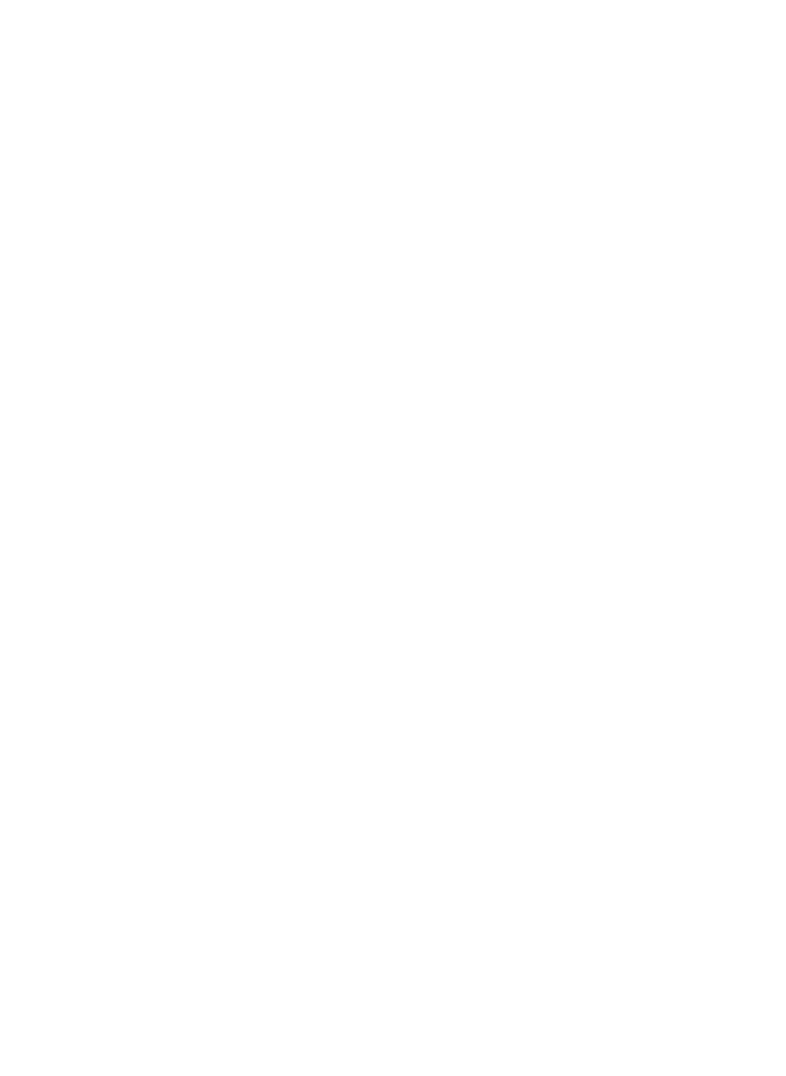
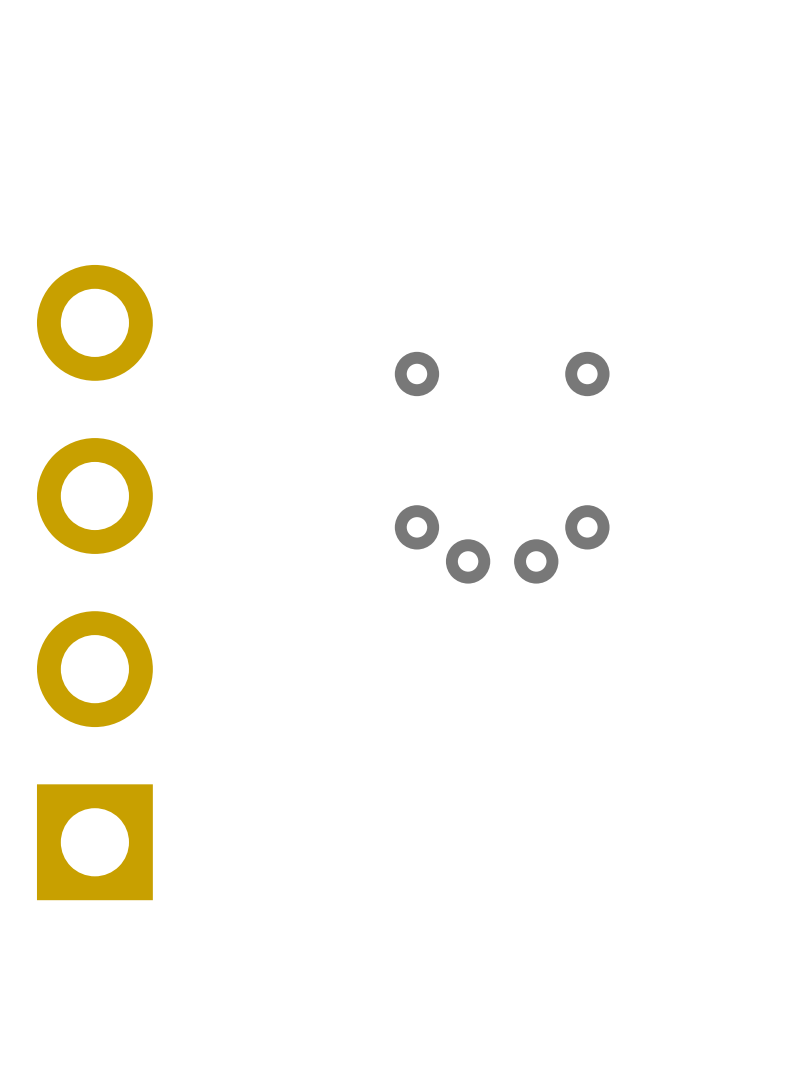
via: none -> (416, 373)
via: none -> (587, 373)
via: none -> (416, 527)
via: none -> (587, 527)
via: none -> (468, 561)
via: none -> (536, 561)
part: none -> (94, 582)

